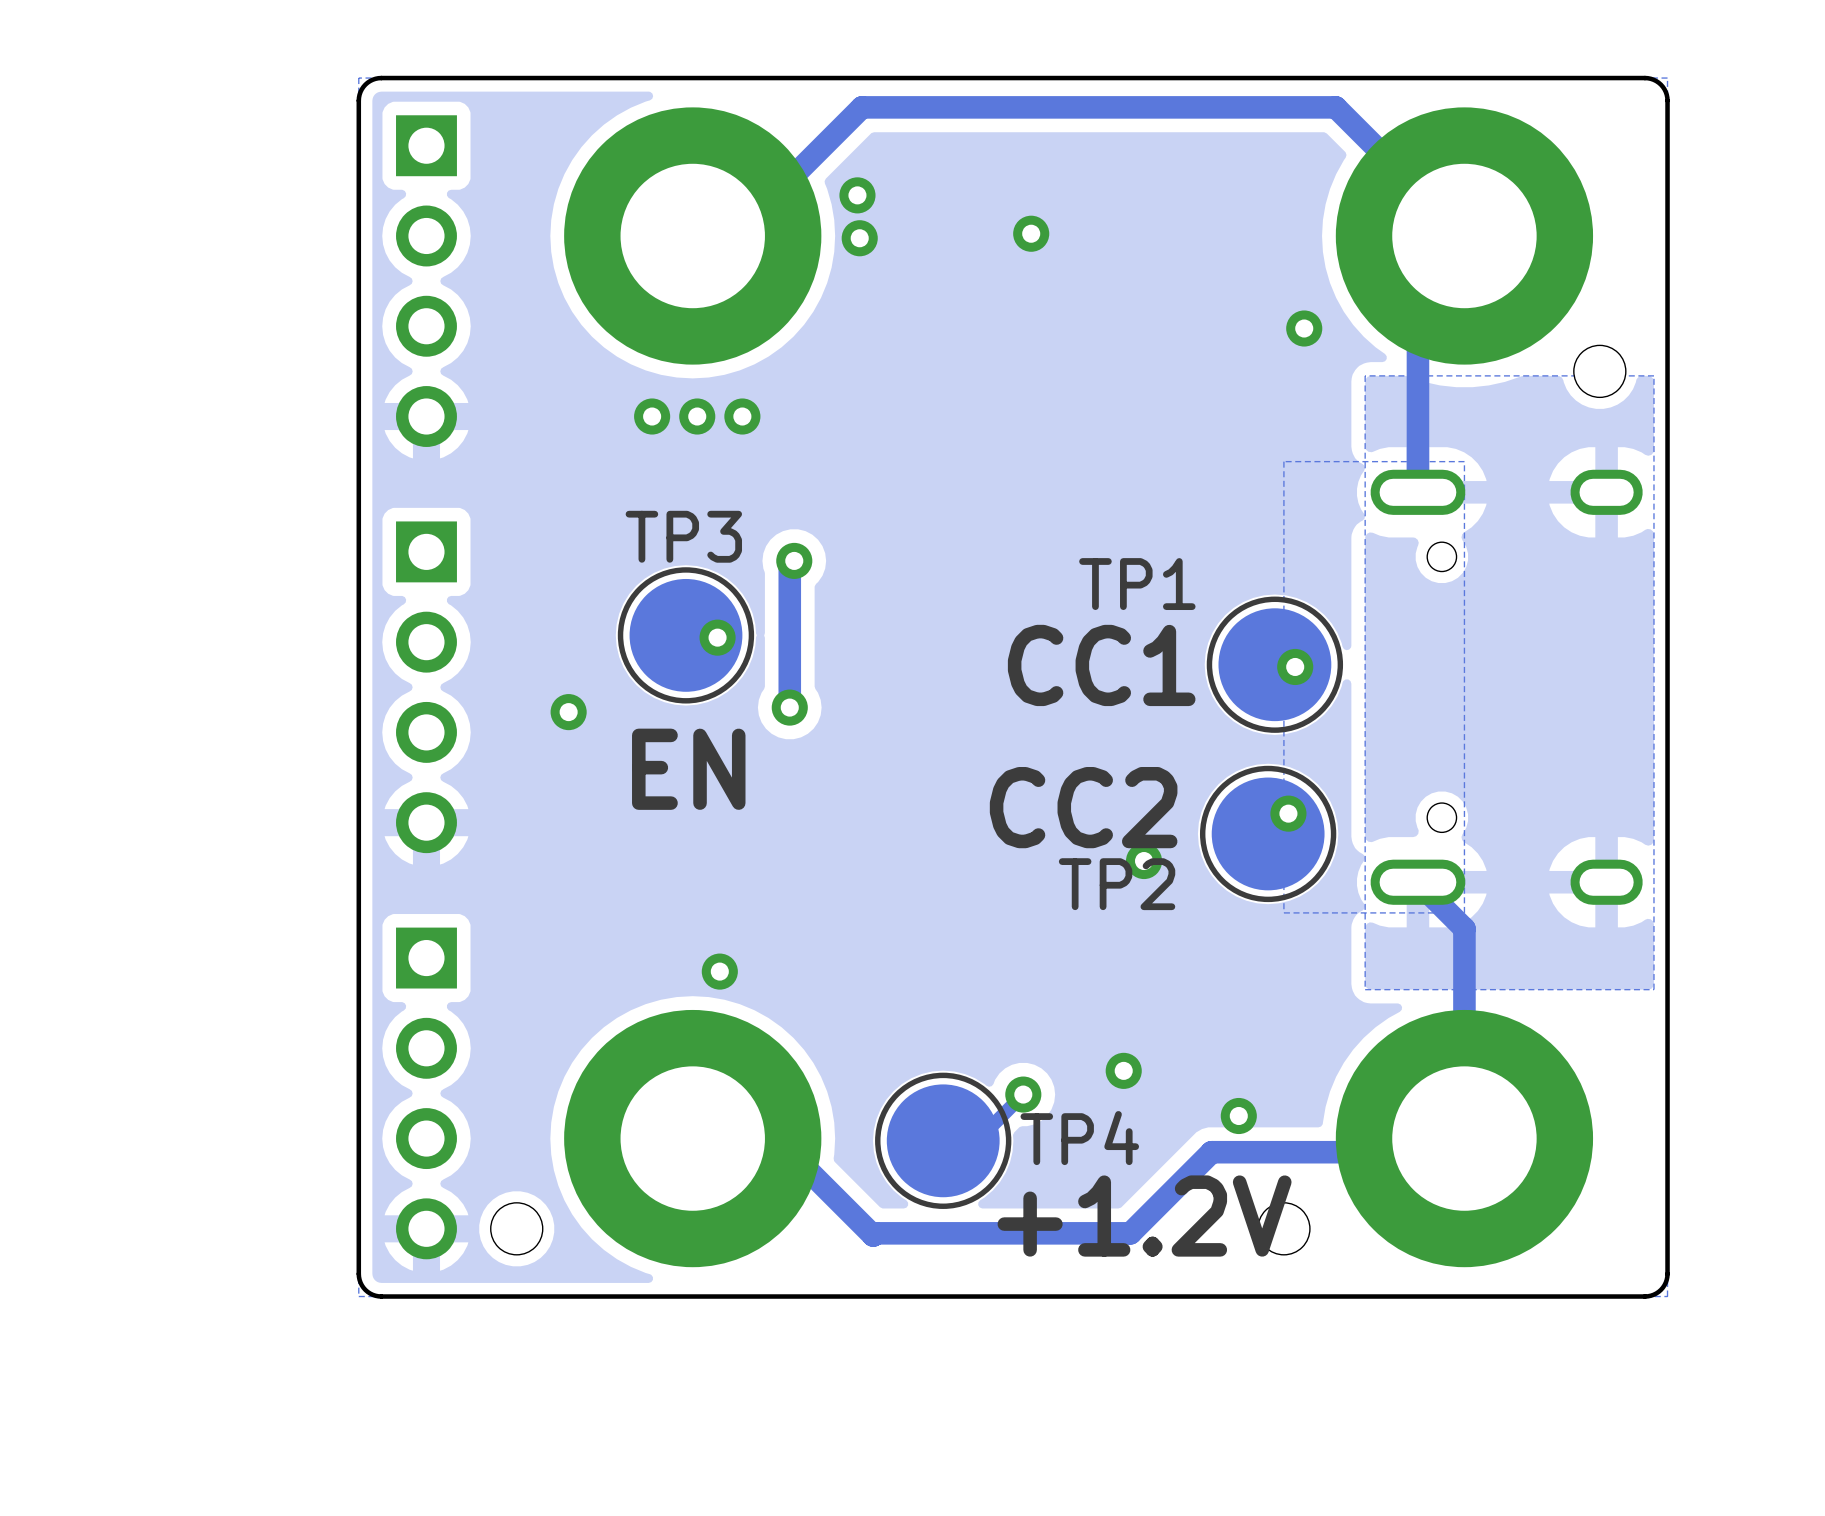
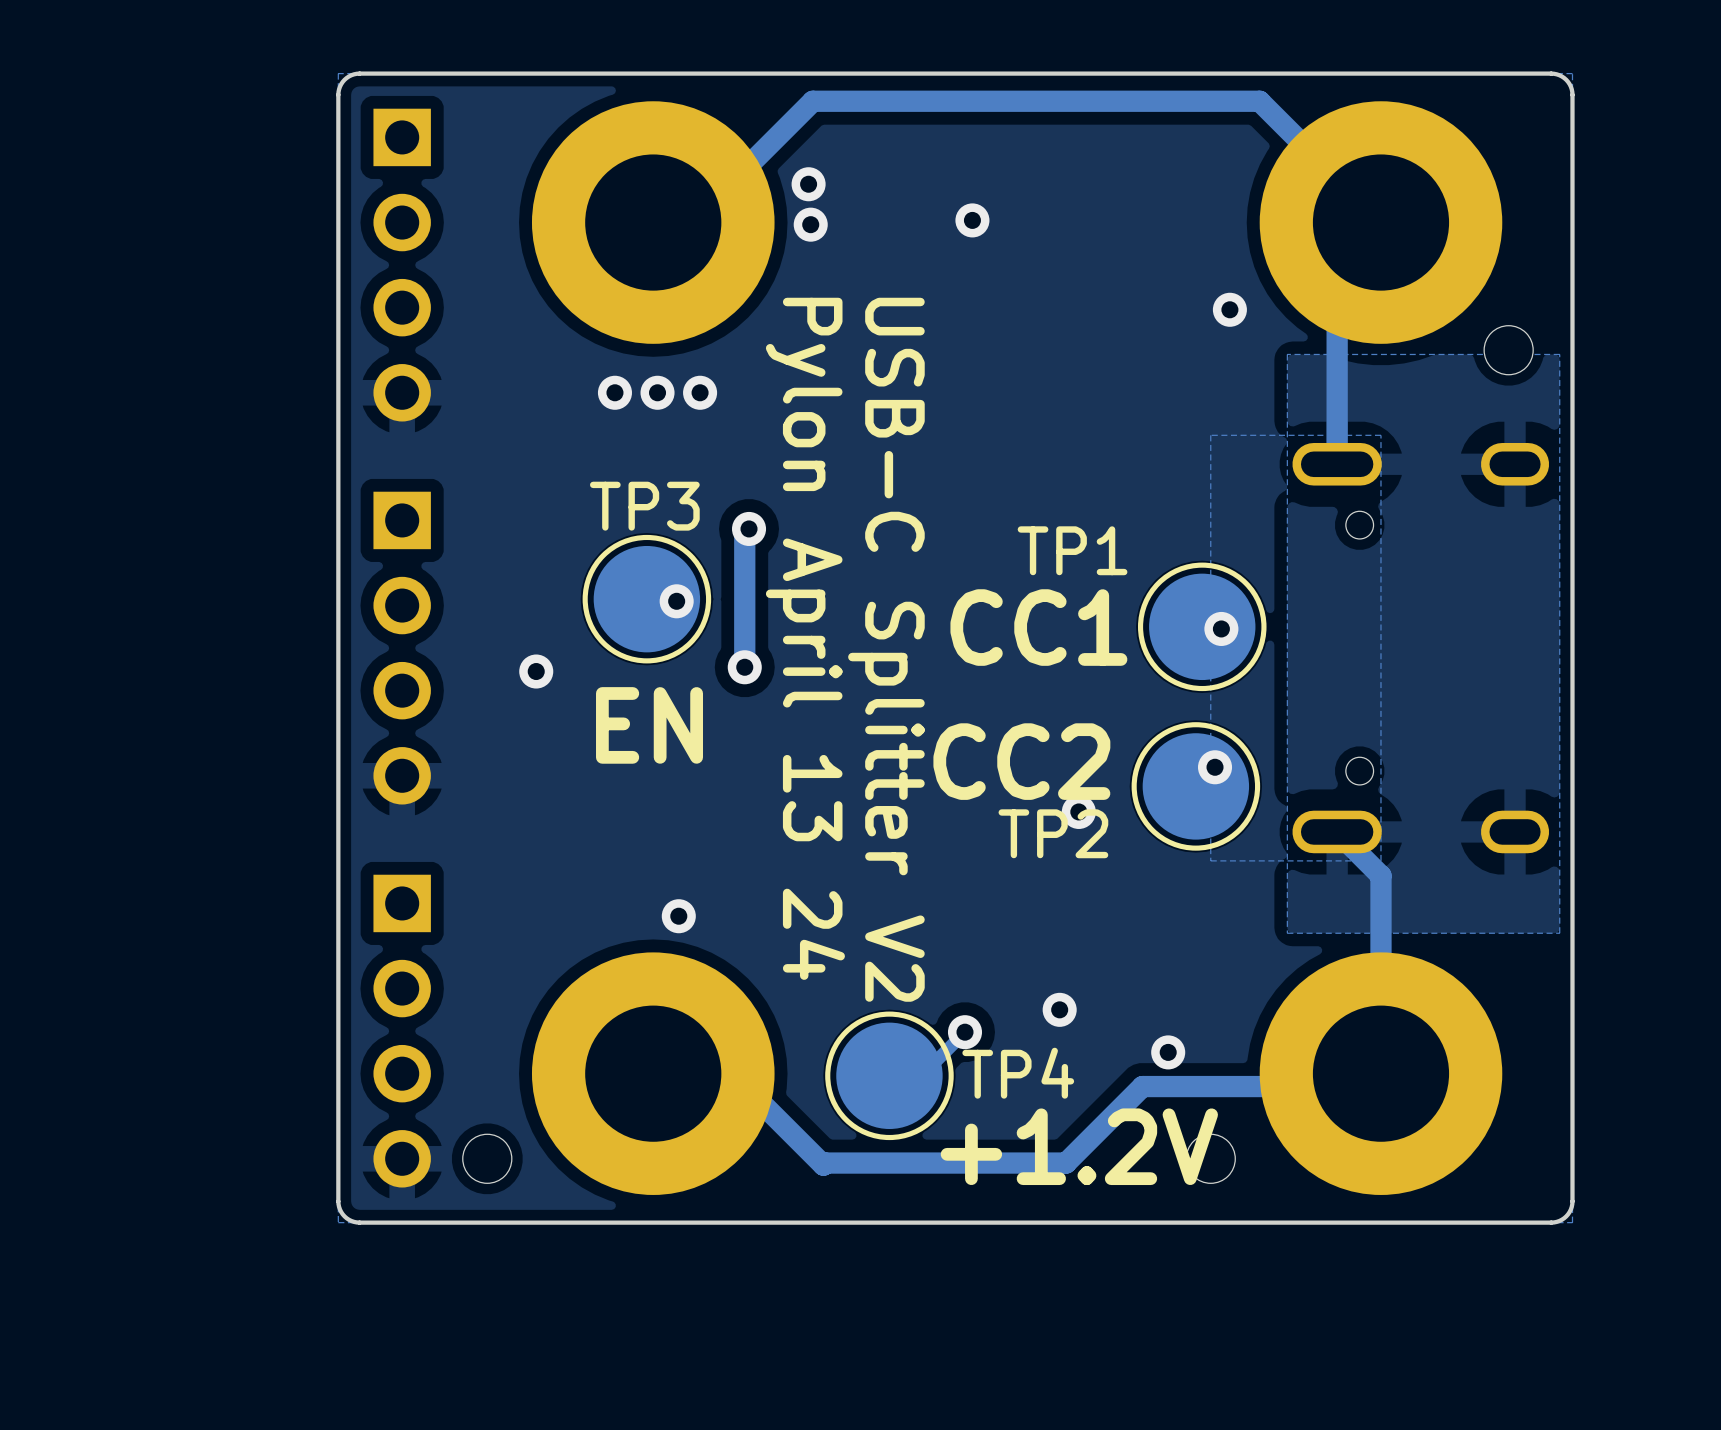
text: none -> Pylon April 13 24 (805, 638)
text: none -> USB-C Splitter V2 (886, 649)

